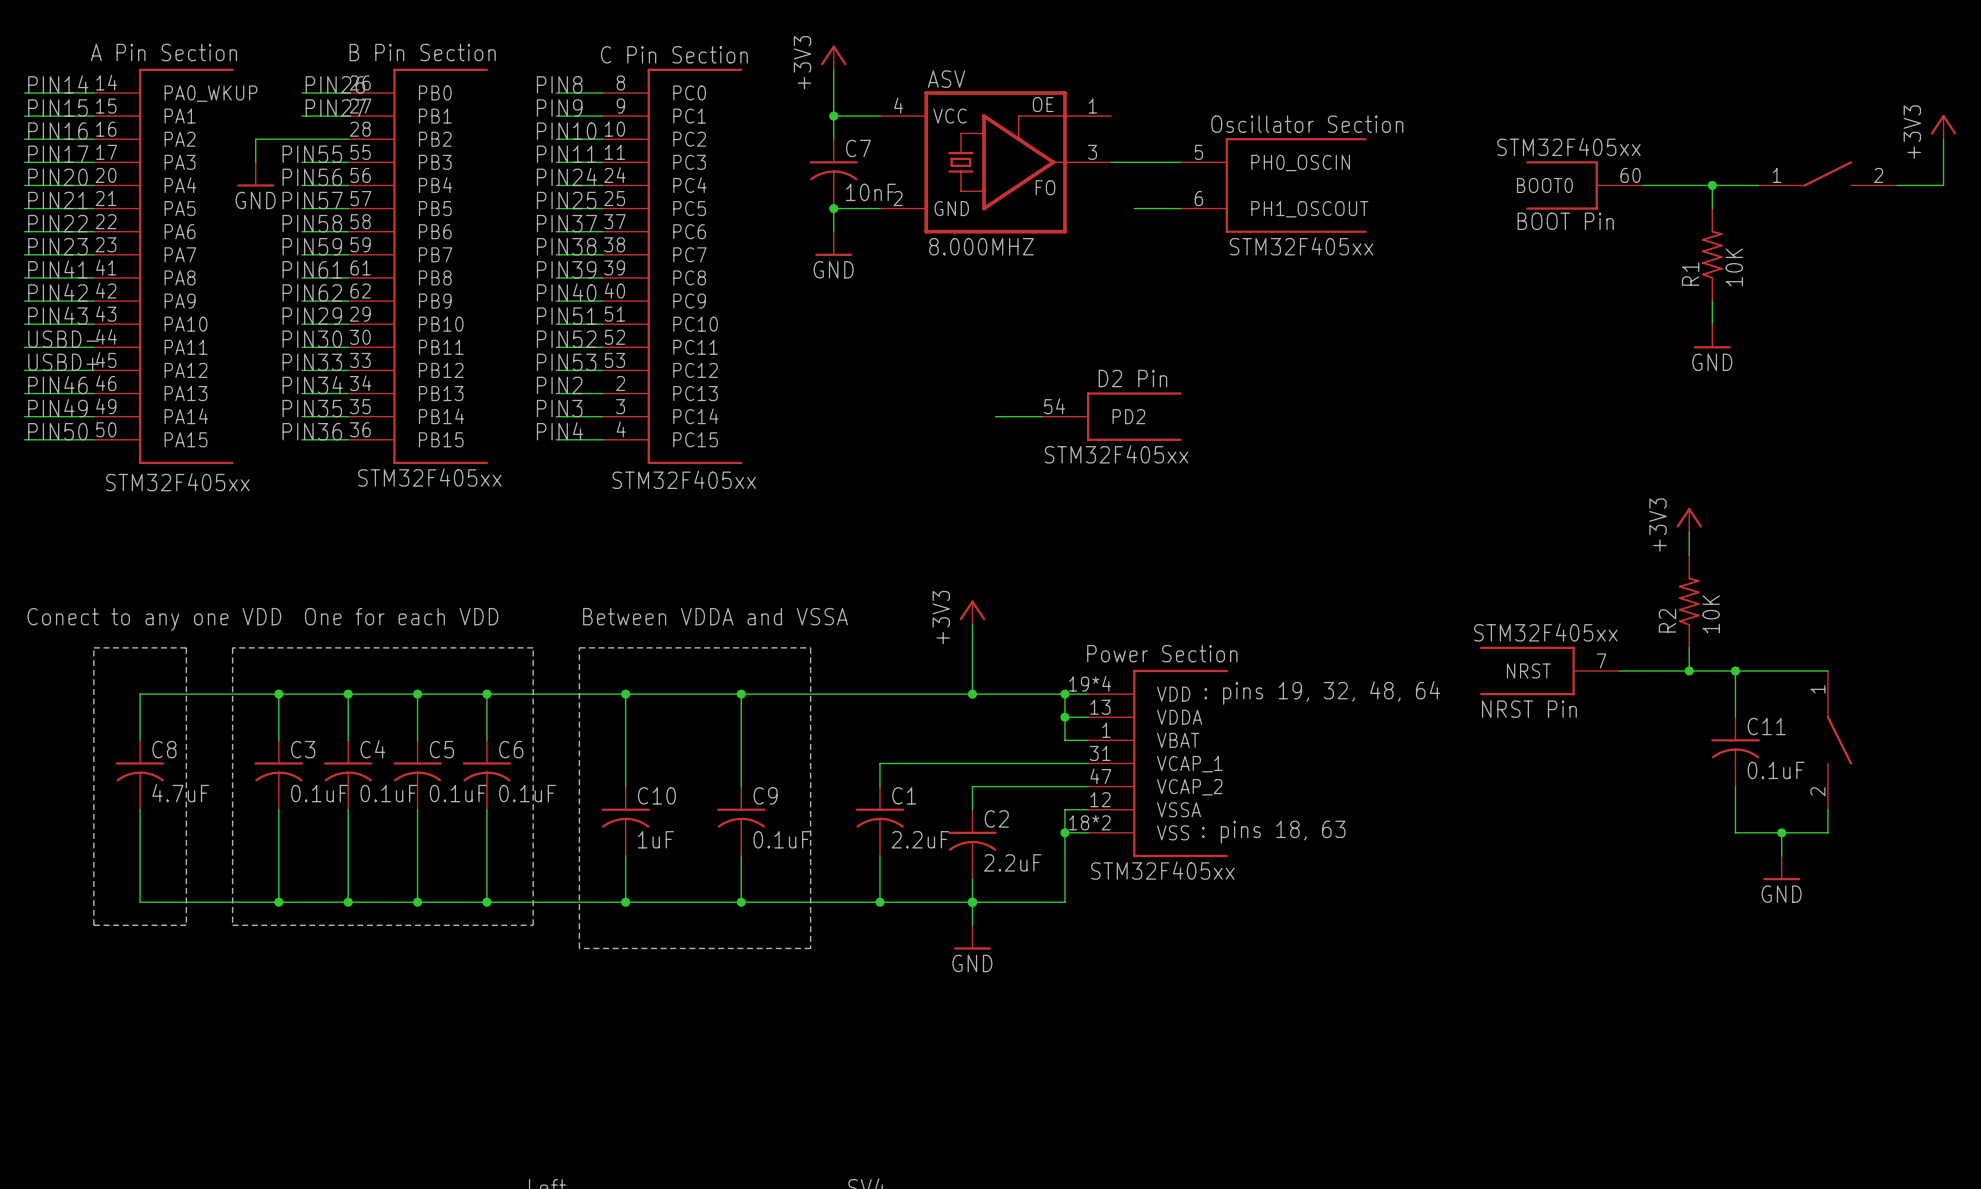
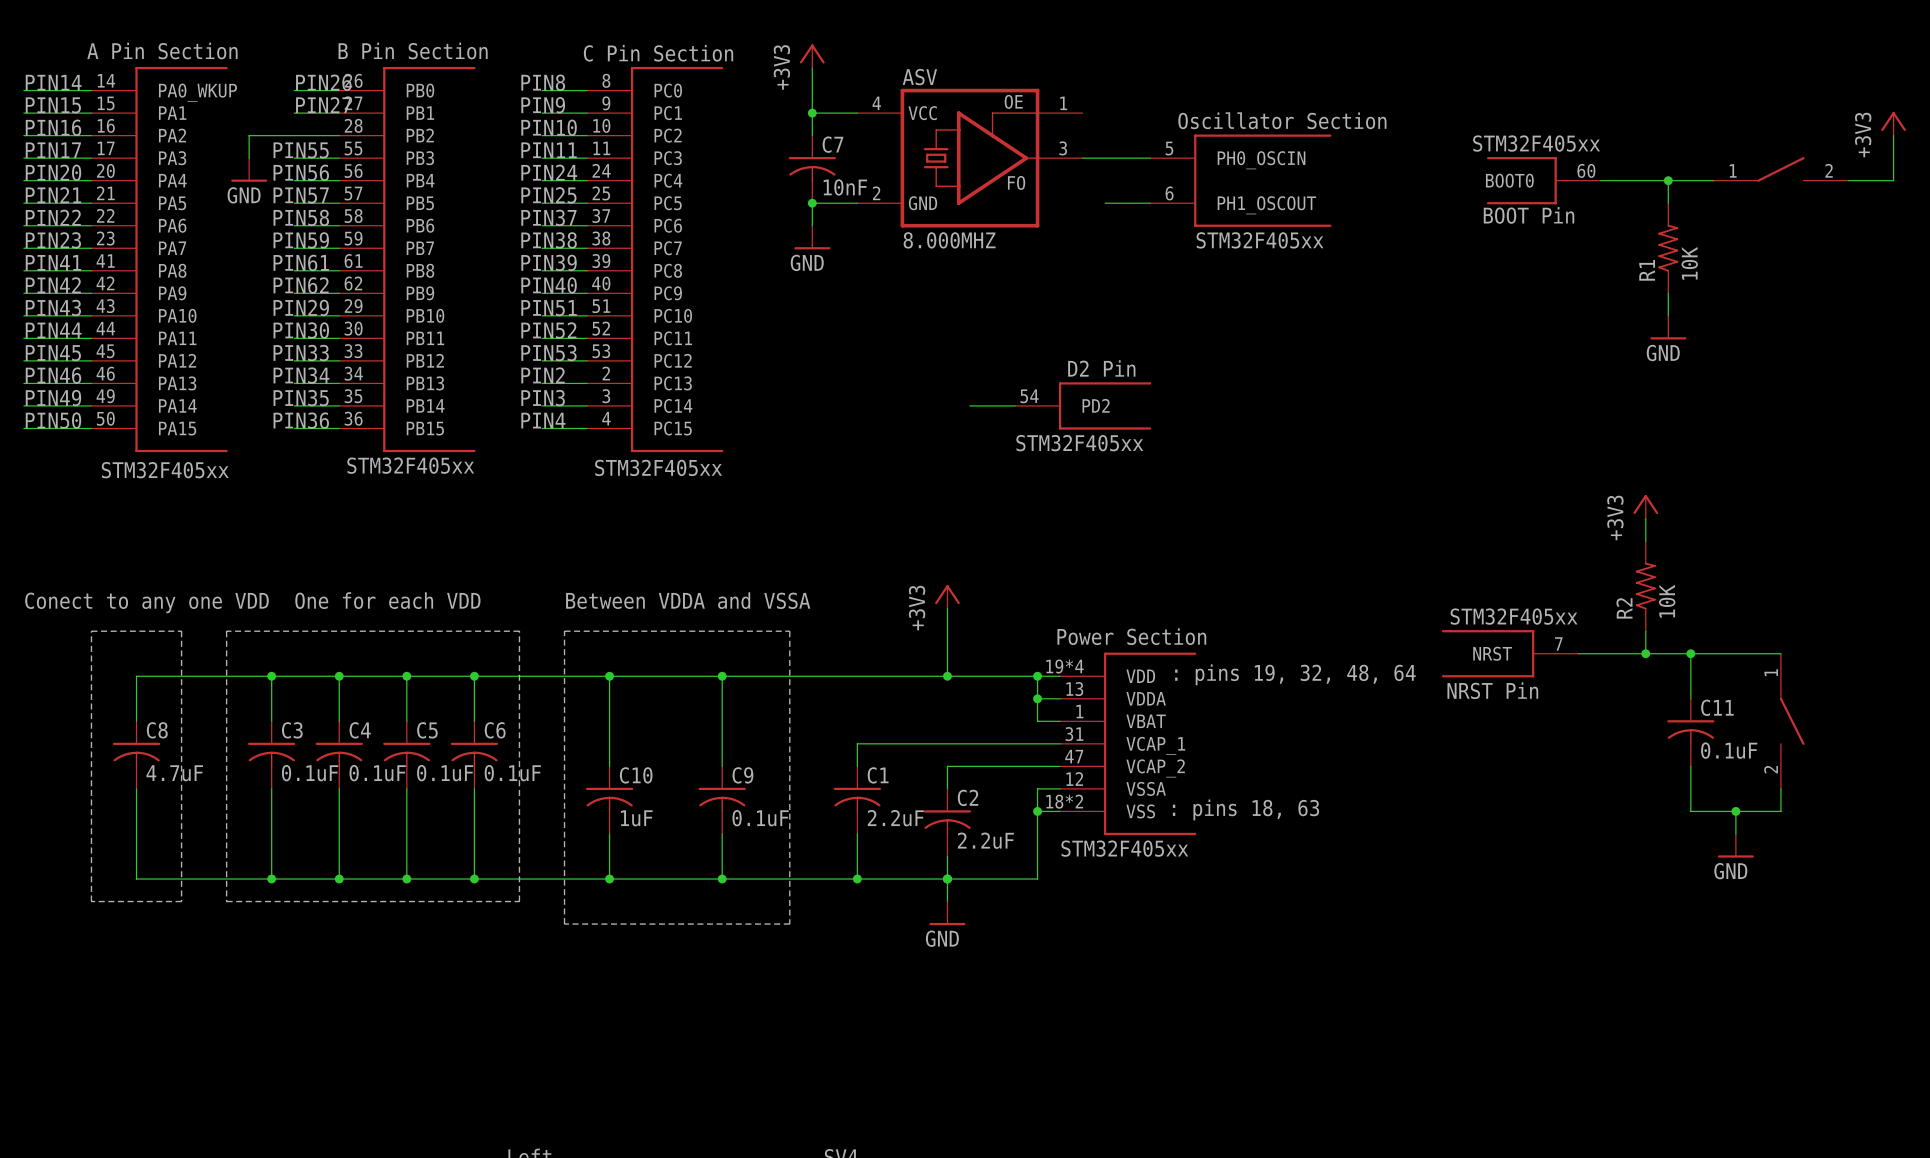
label: USBD- (63, 339) -> PIN44 (53, 330)
label: USBD+ (63, 362) -> PIN45 (53, 353)

